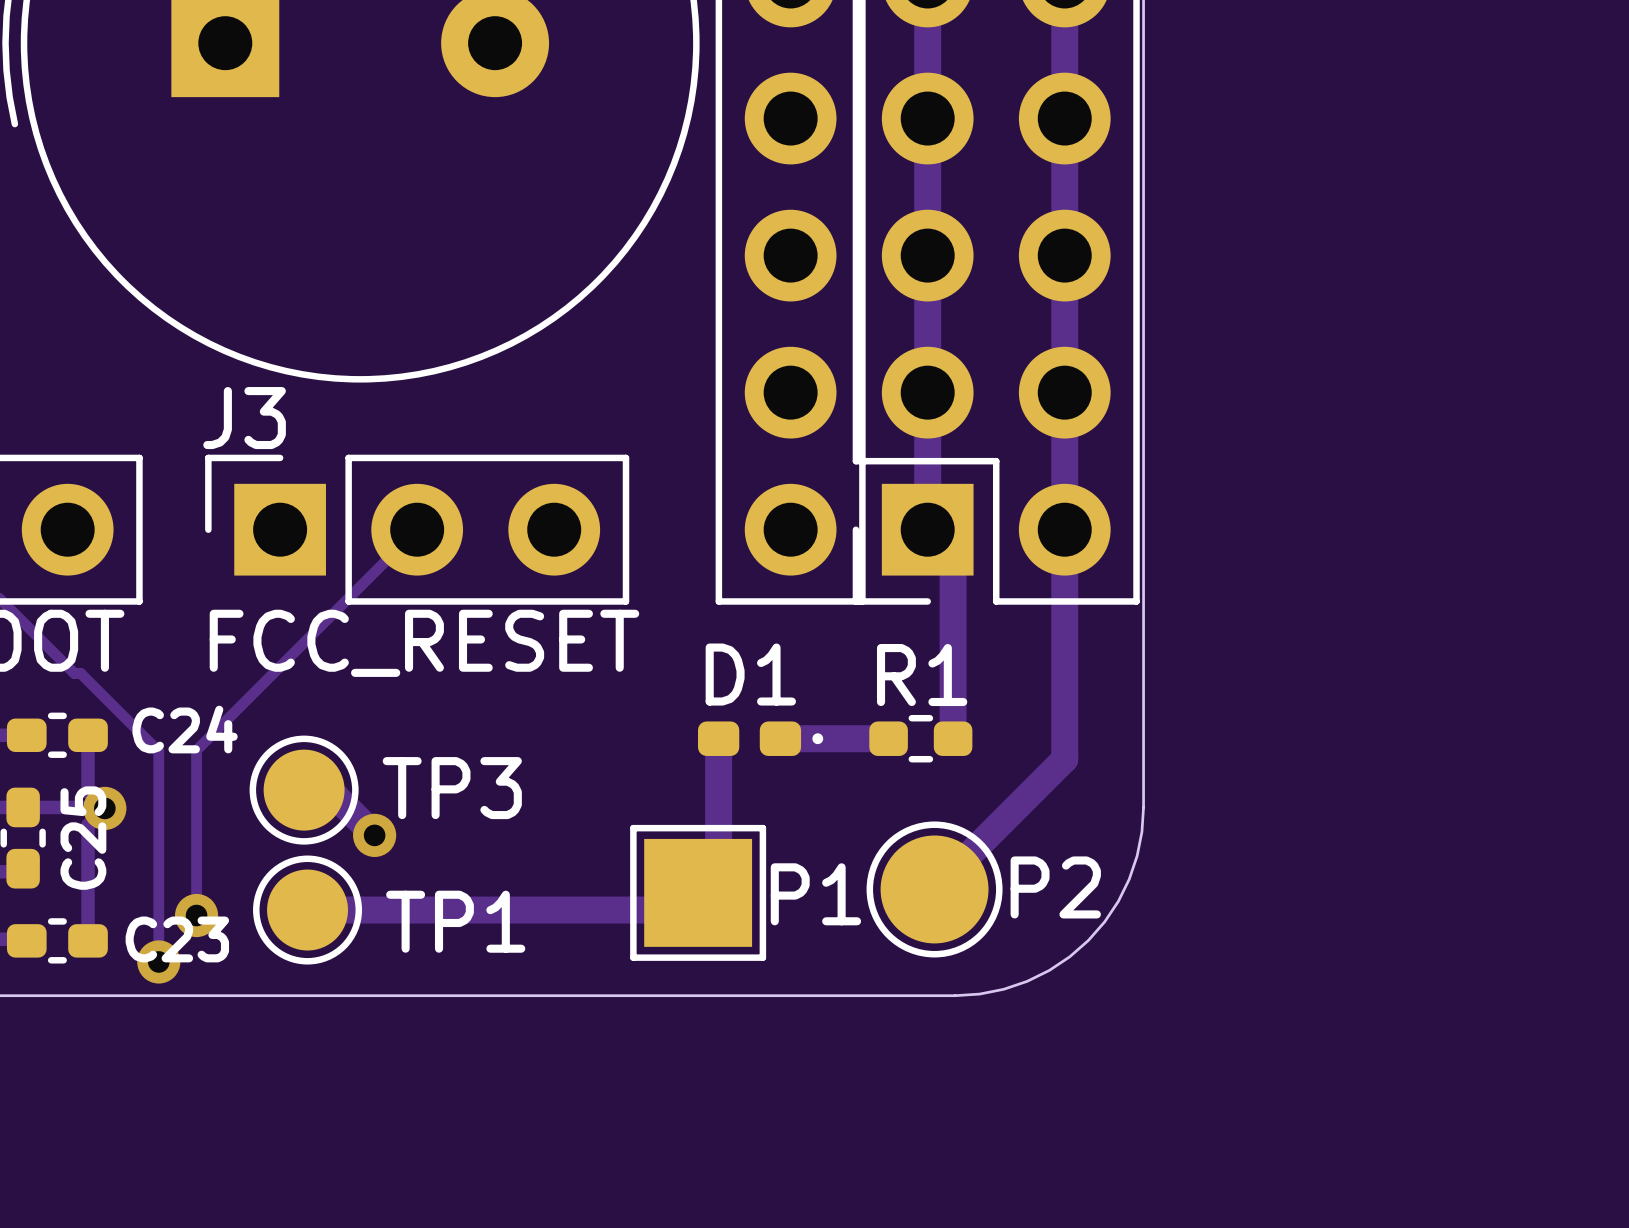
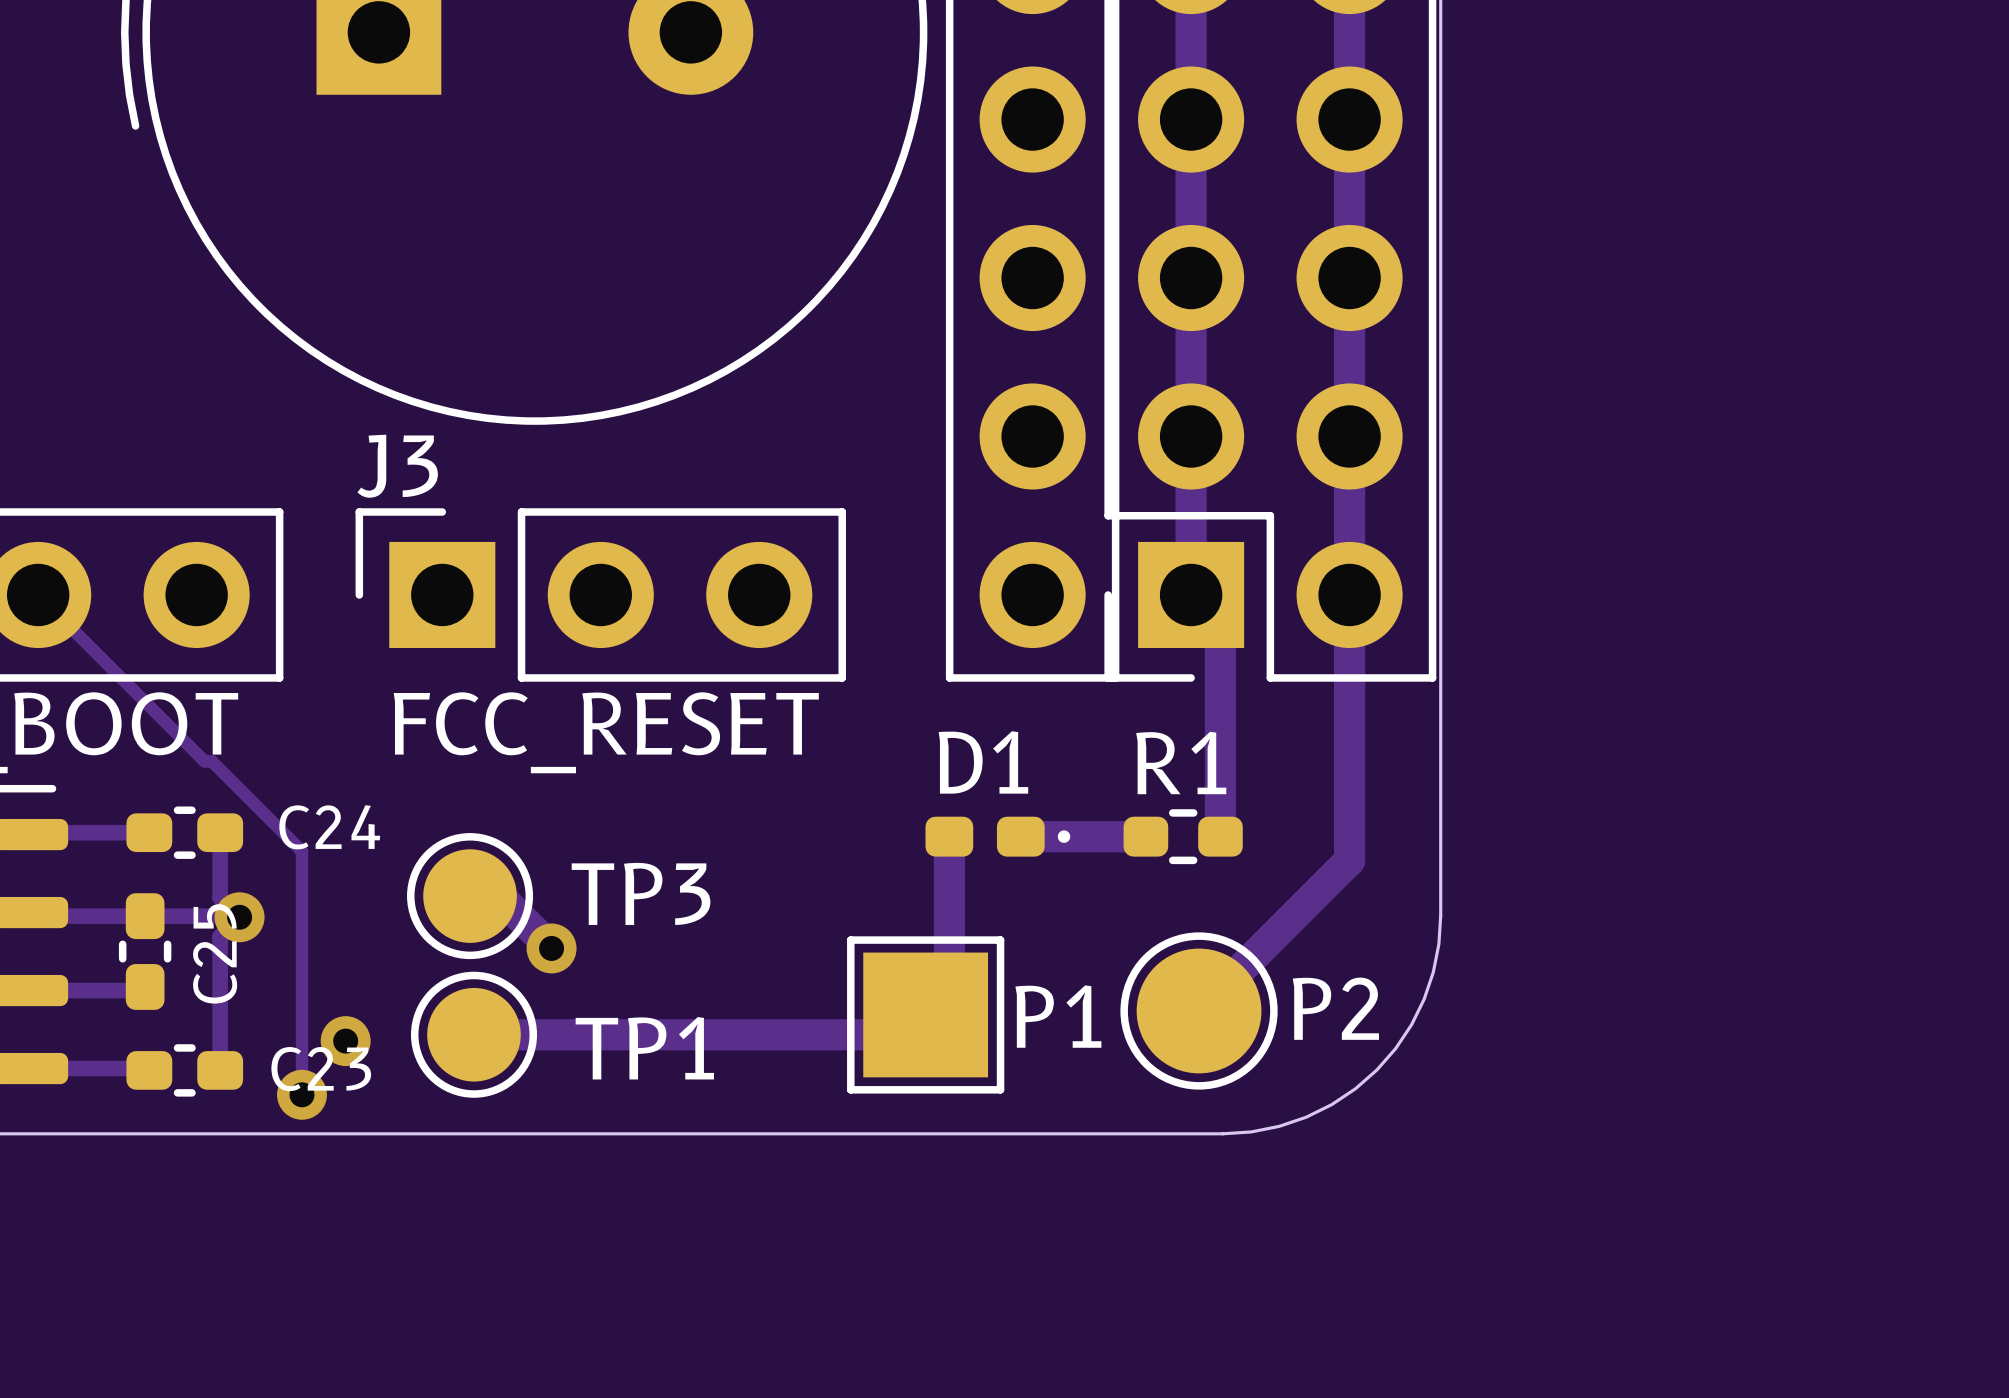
track: (417, 529) (196, 750) (196, 915) -> none

